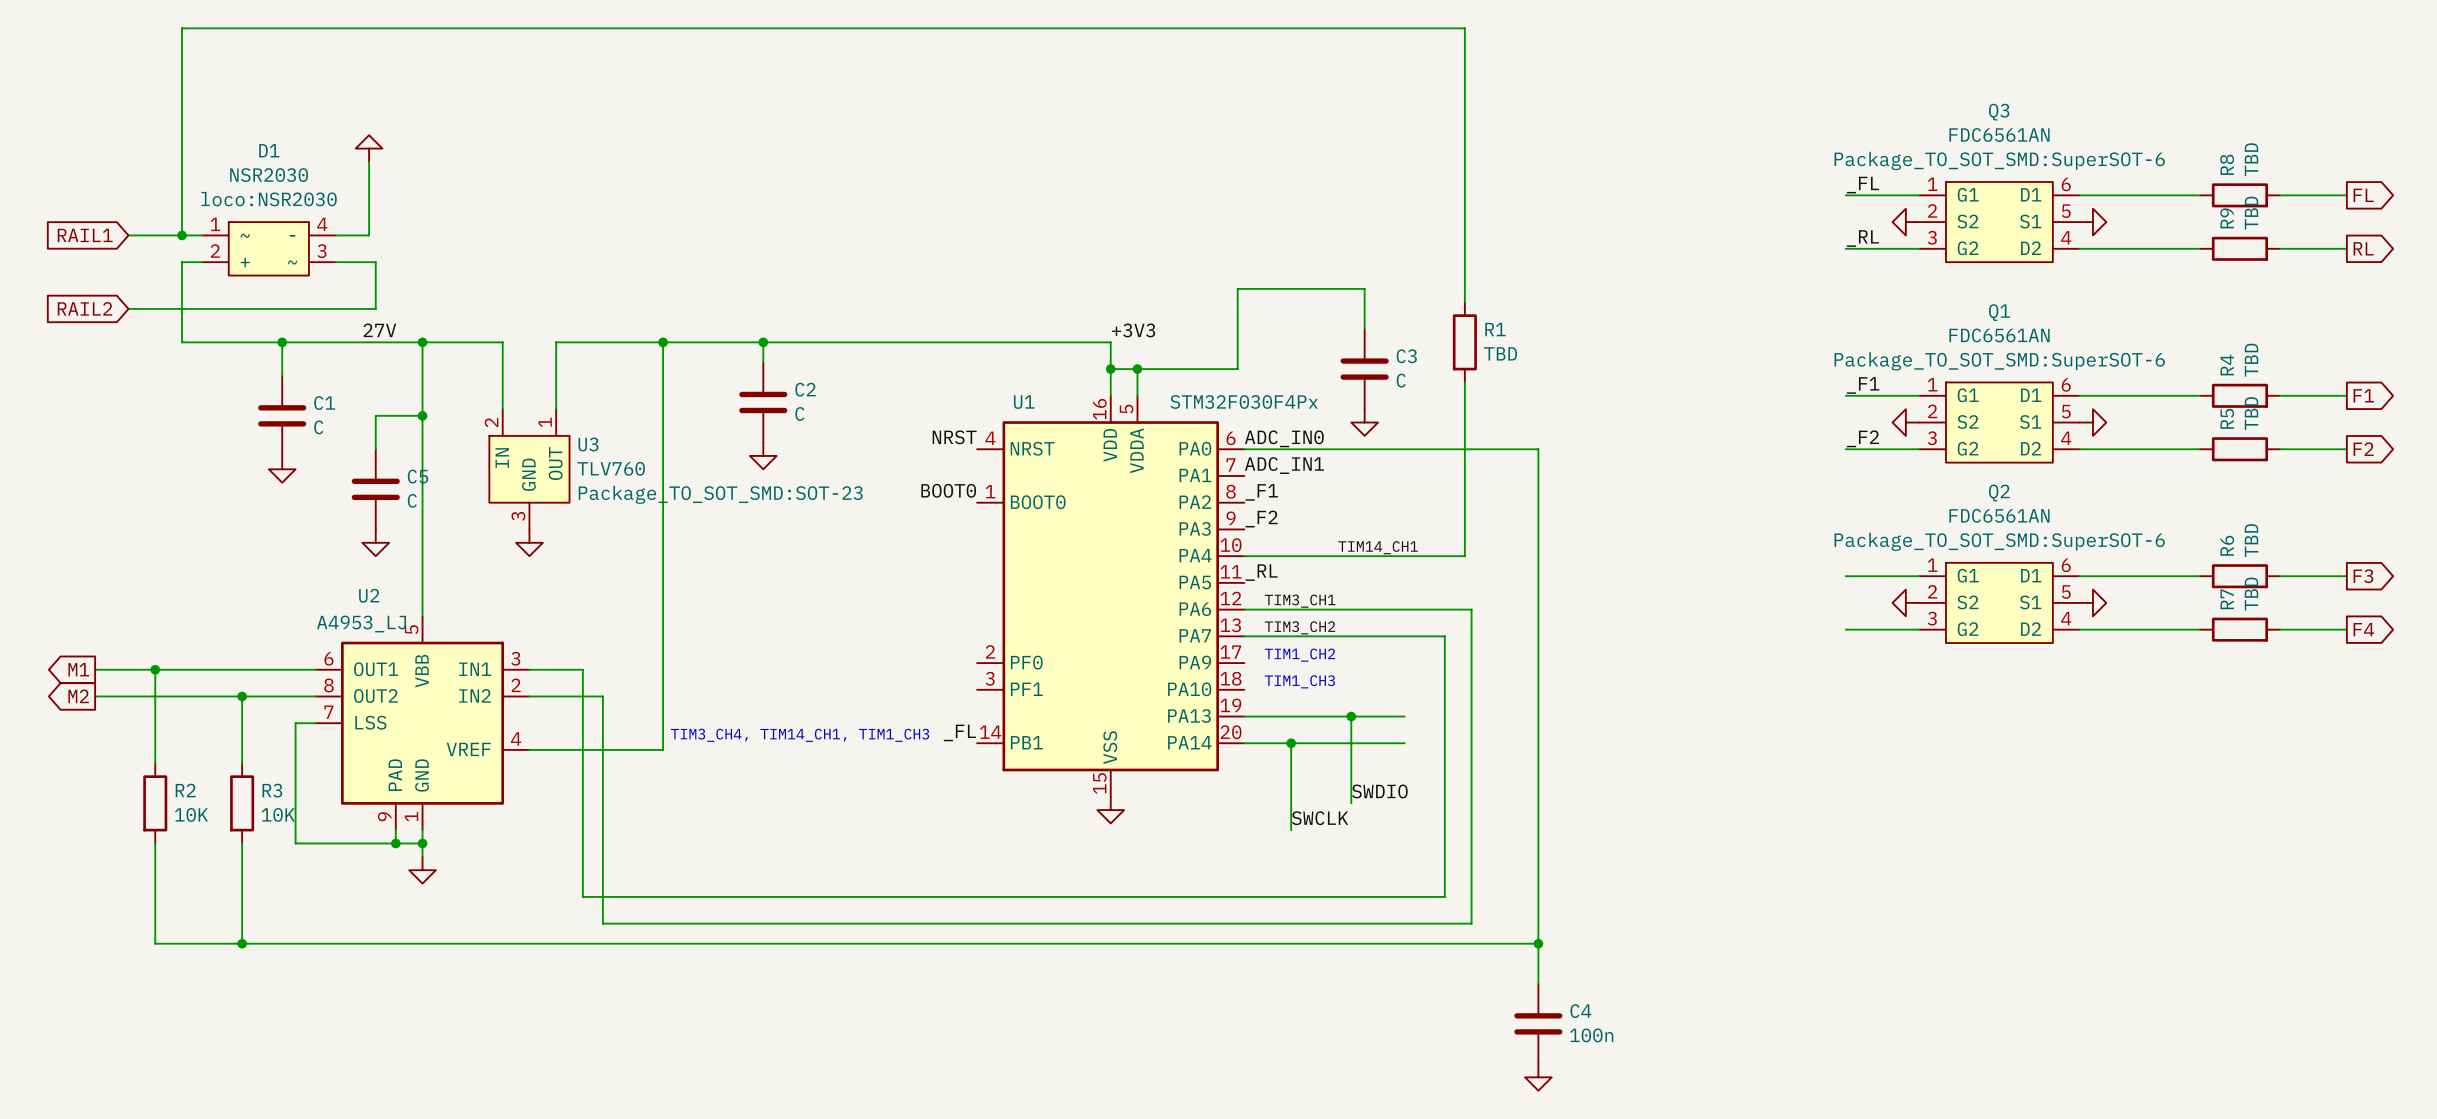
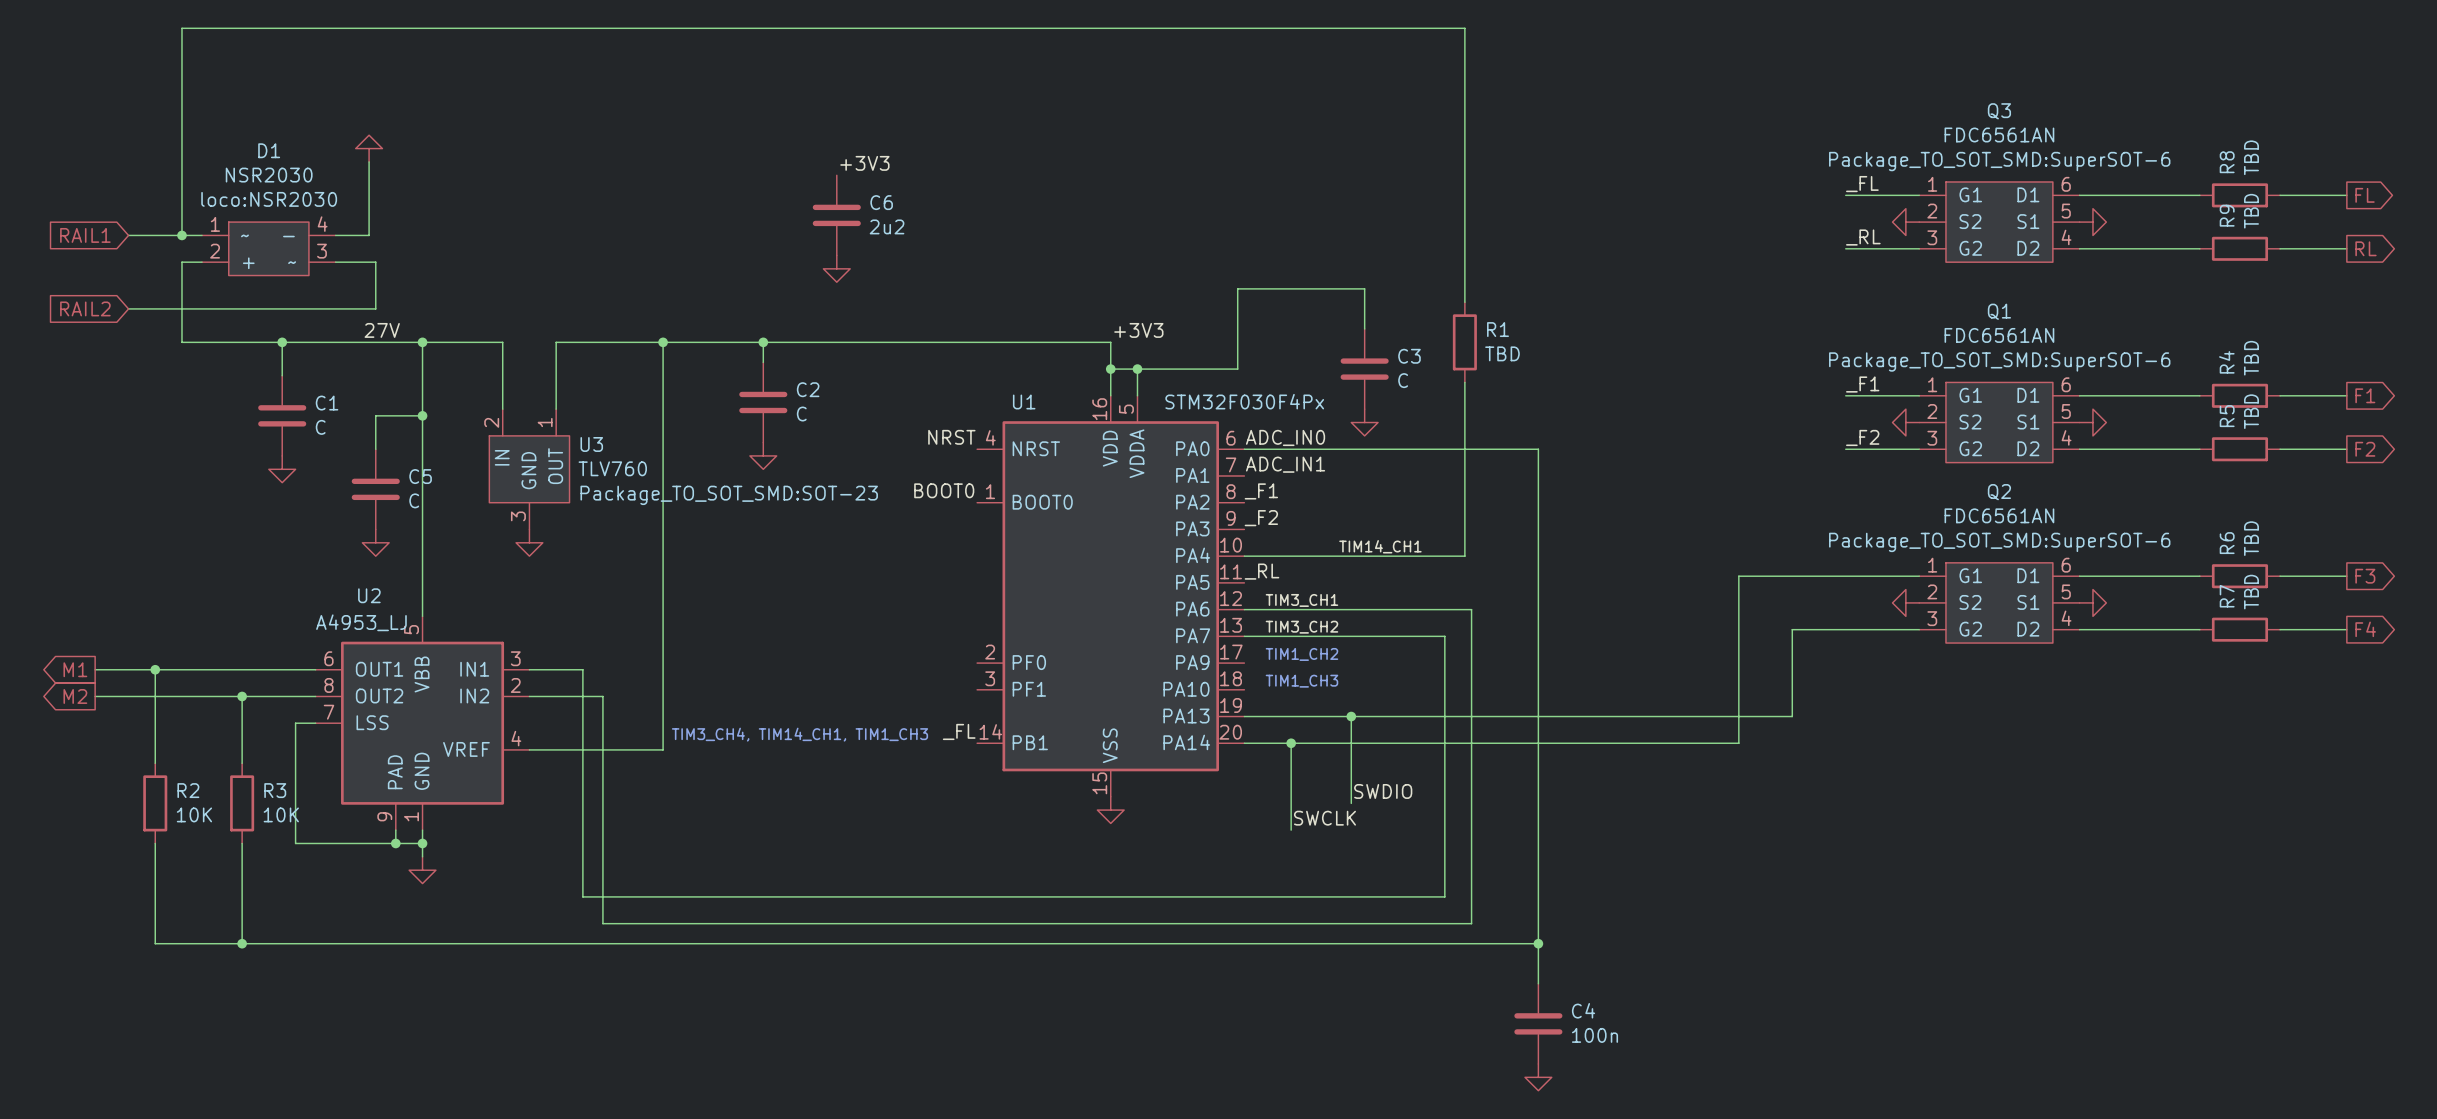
label: none -> +3V3 (864, 163)
C6: none -> 2u2 (836, 215)
power symbol: none -> (836, 268)
wire: none -> (1845, 576) (1738, 576) (1738, 743) (1404, 743)
wire: none -> (1845, 629) (1792, 629) (1792, 716) (1404, 716)

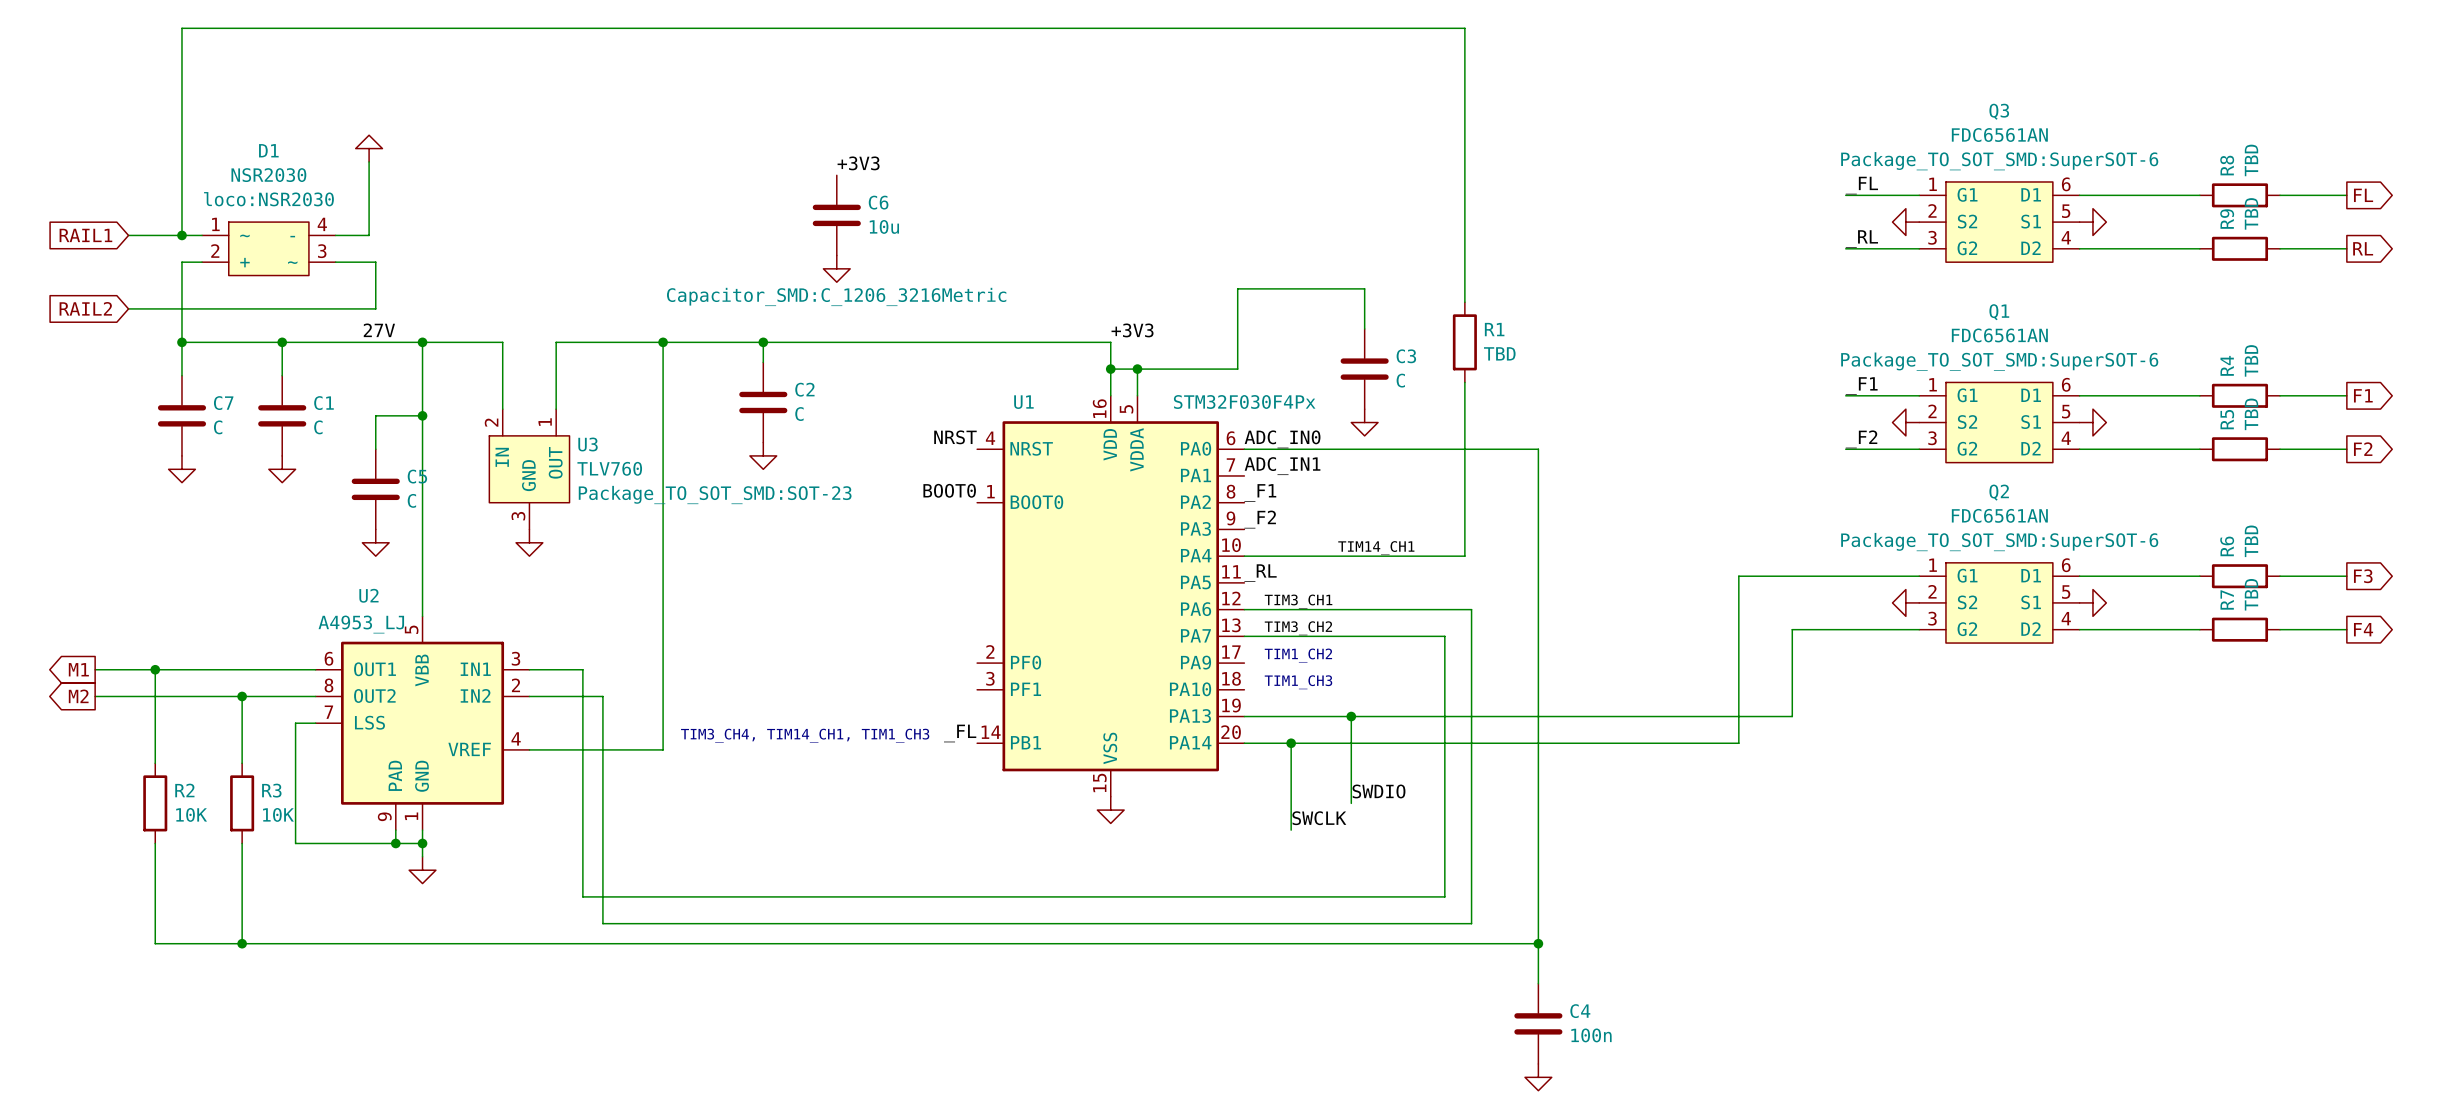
C6 value: 2u2 (887, 226) -> 10u (884, 226)
C6 text: none -> Capacitor_SMD:C_1206_3216Metric (836, 296)
wire: none -> (181, 342) (181, 375)
junction: none -> (181, 342)
C7: none -> C (181, 415)
power symbol: none -> (181, 469)

